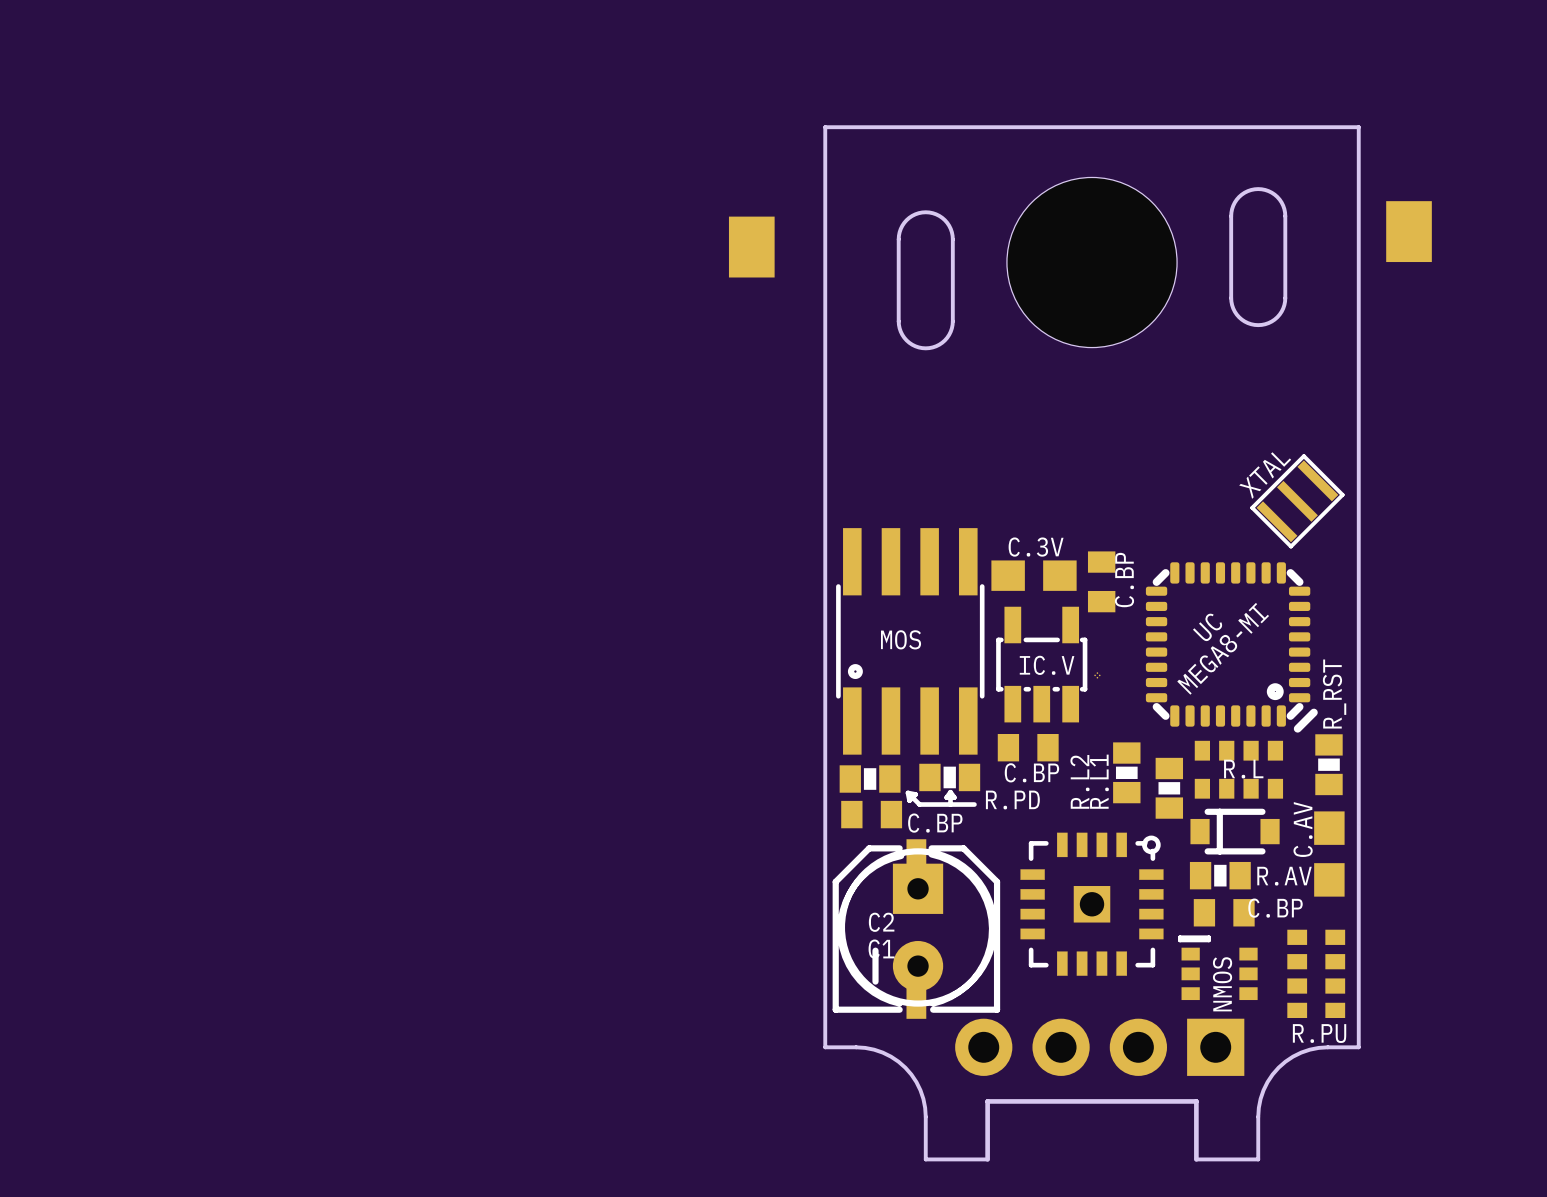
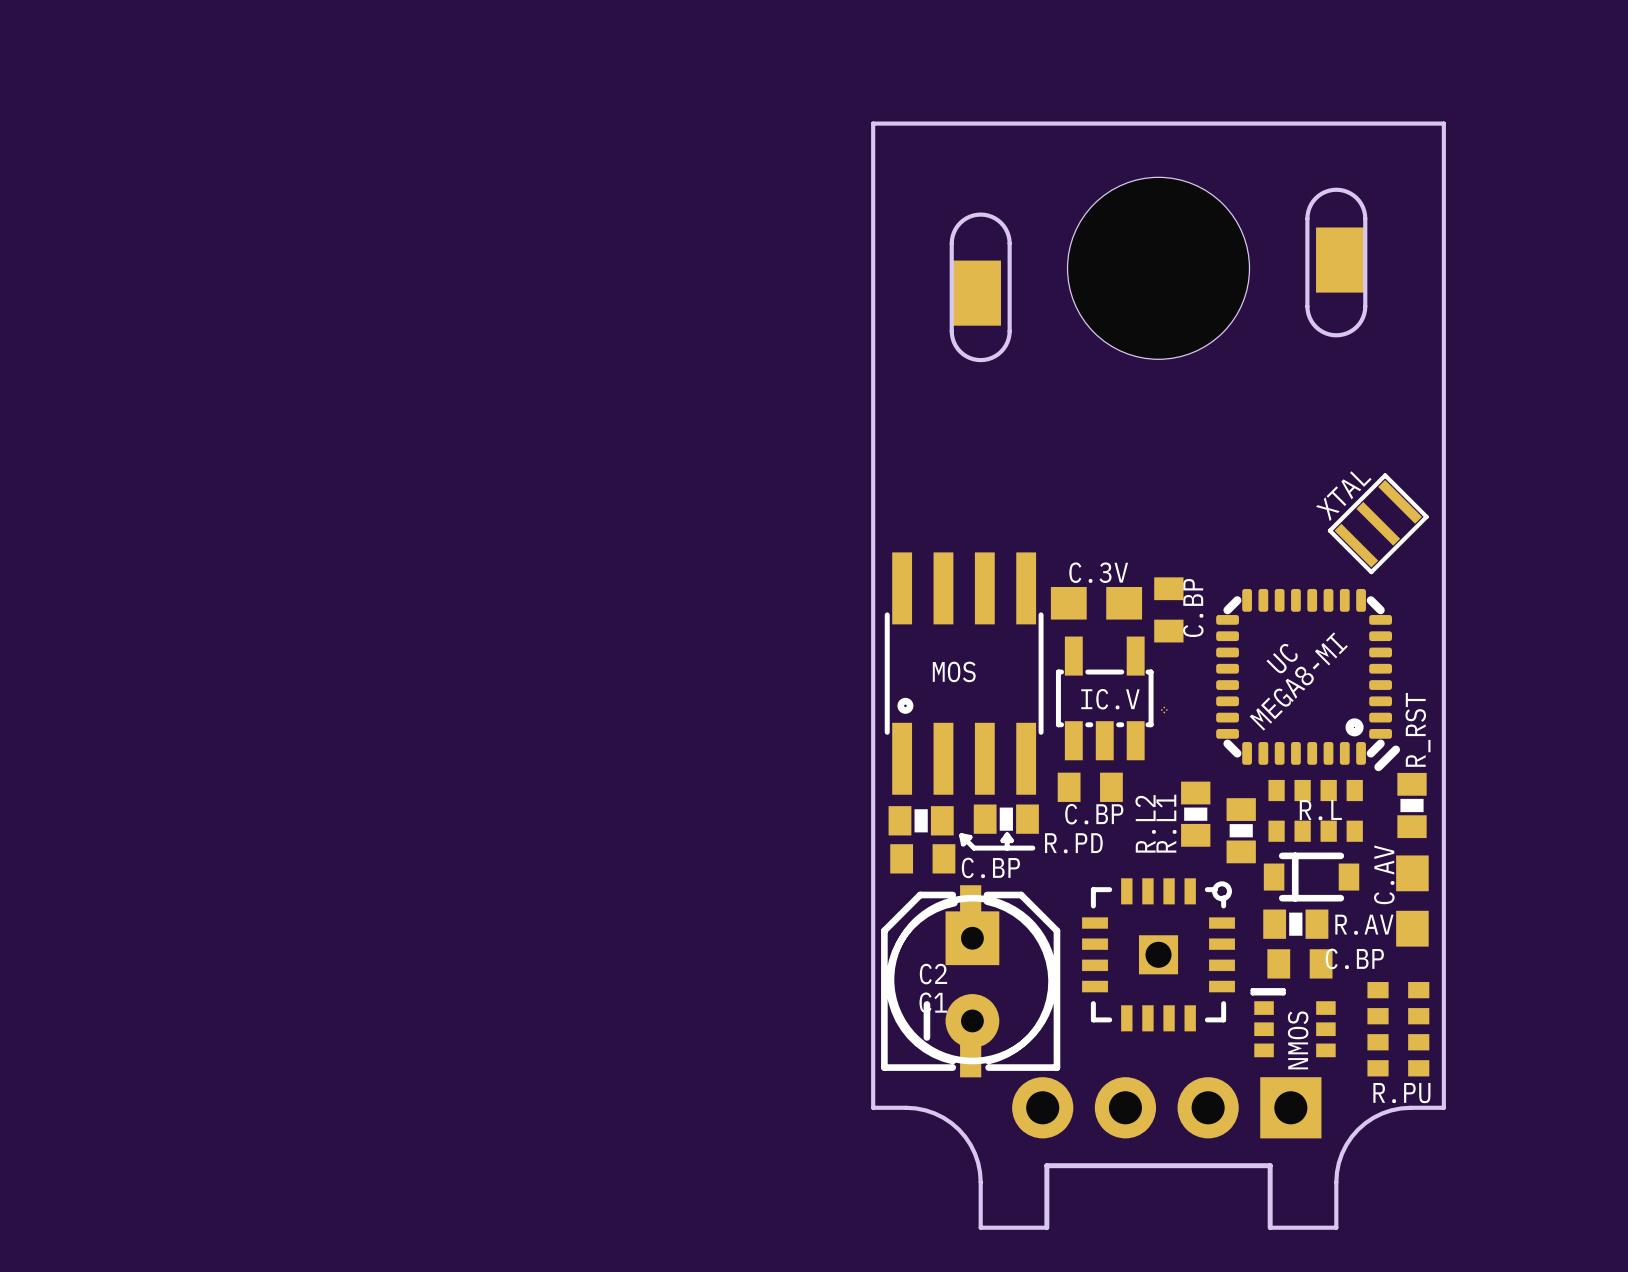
part position: (1409, 231) -> (1340, 260)
part position: (751, 247) -> (976, 293)

